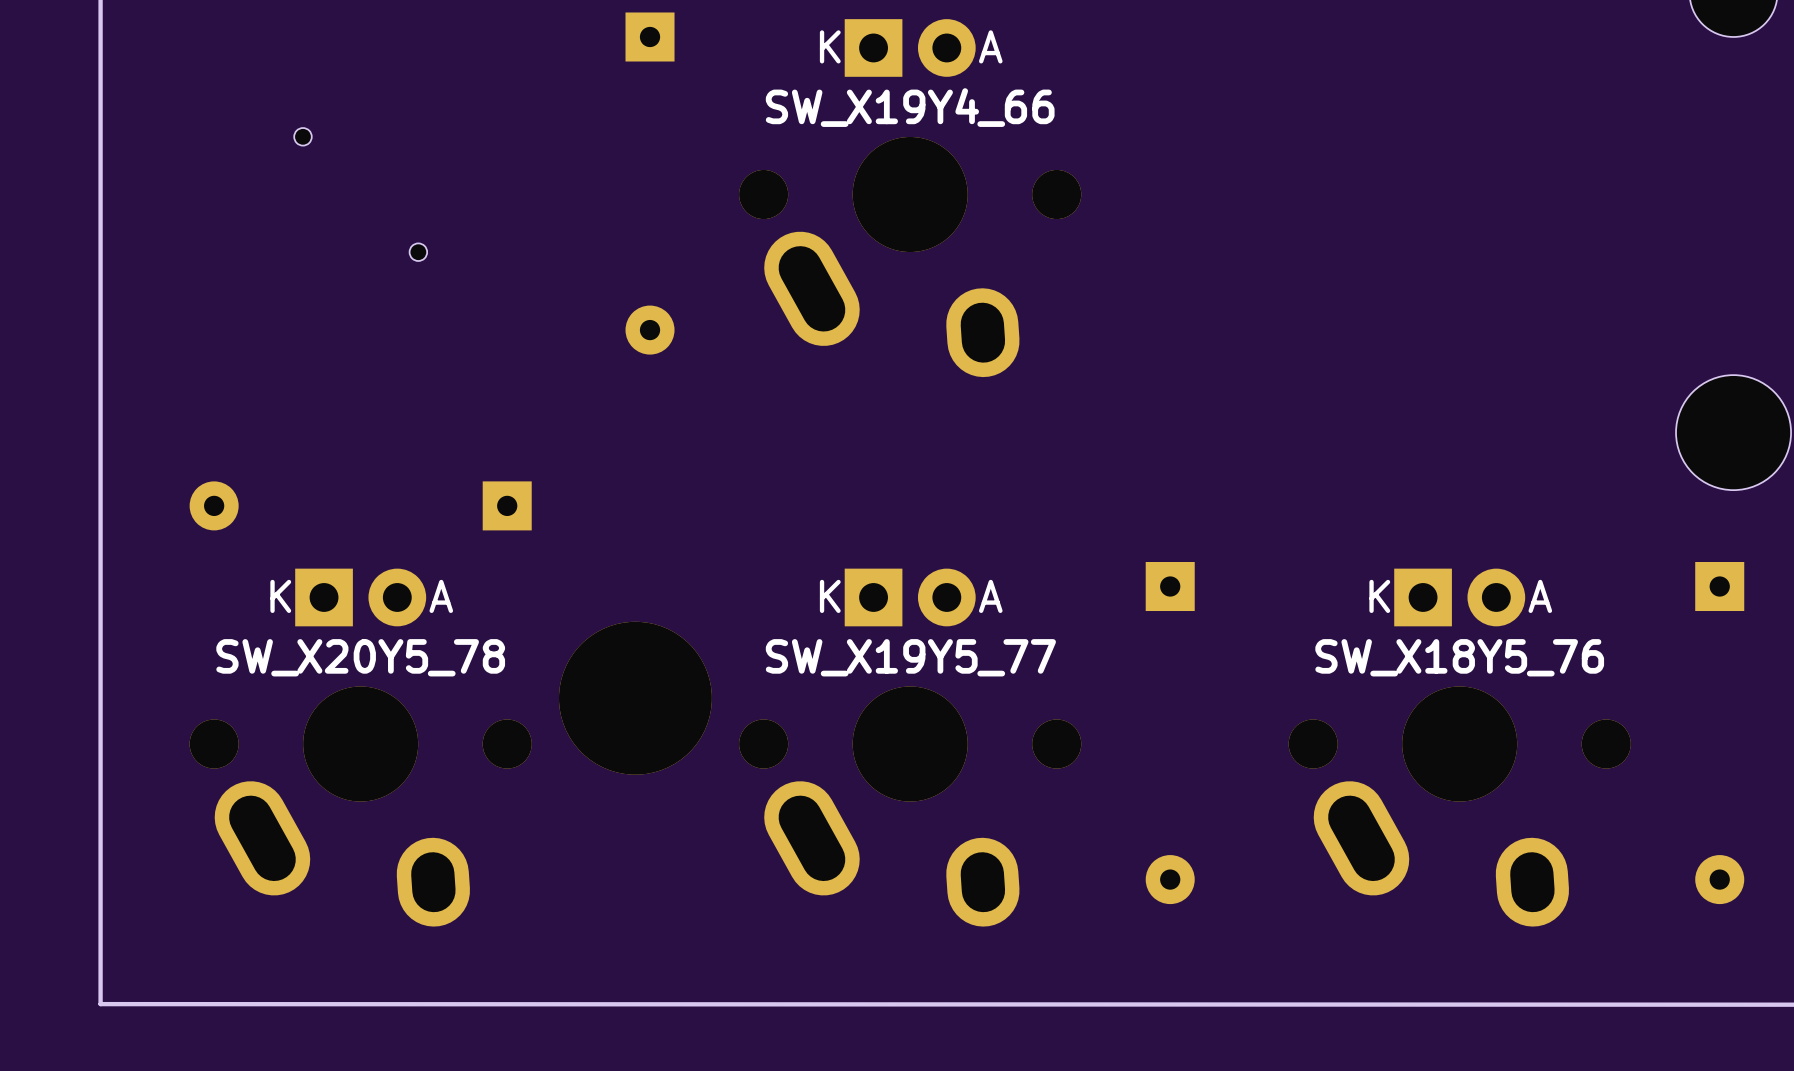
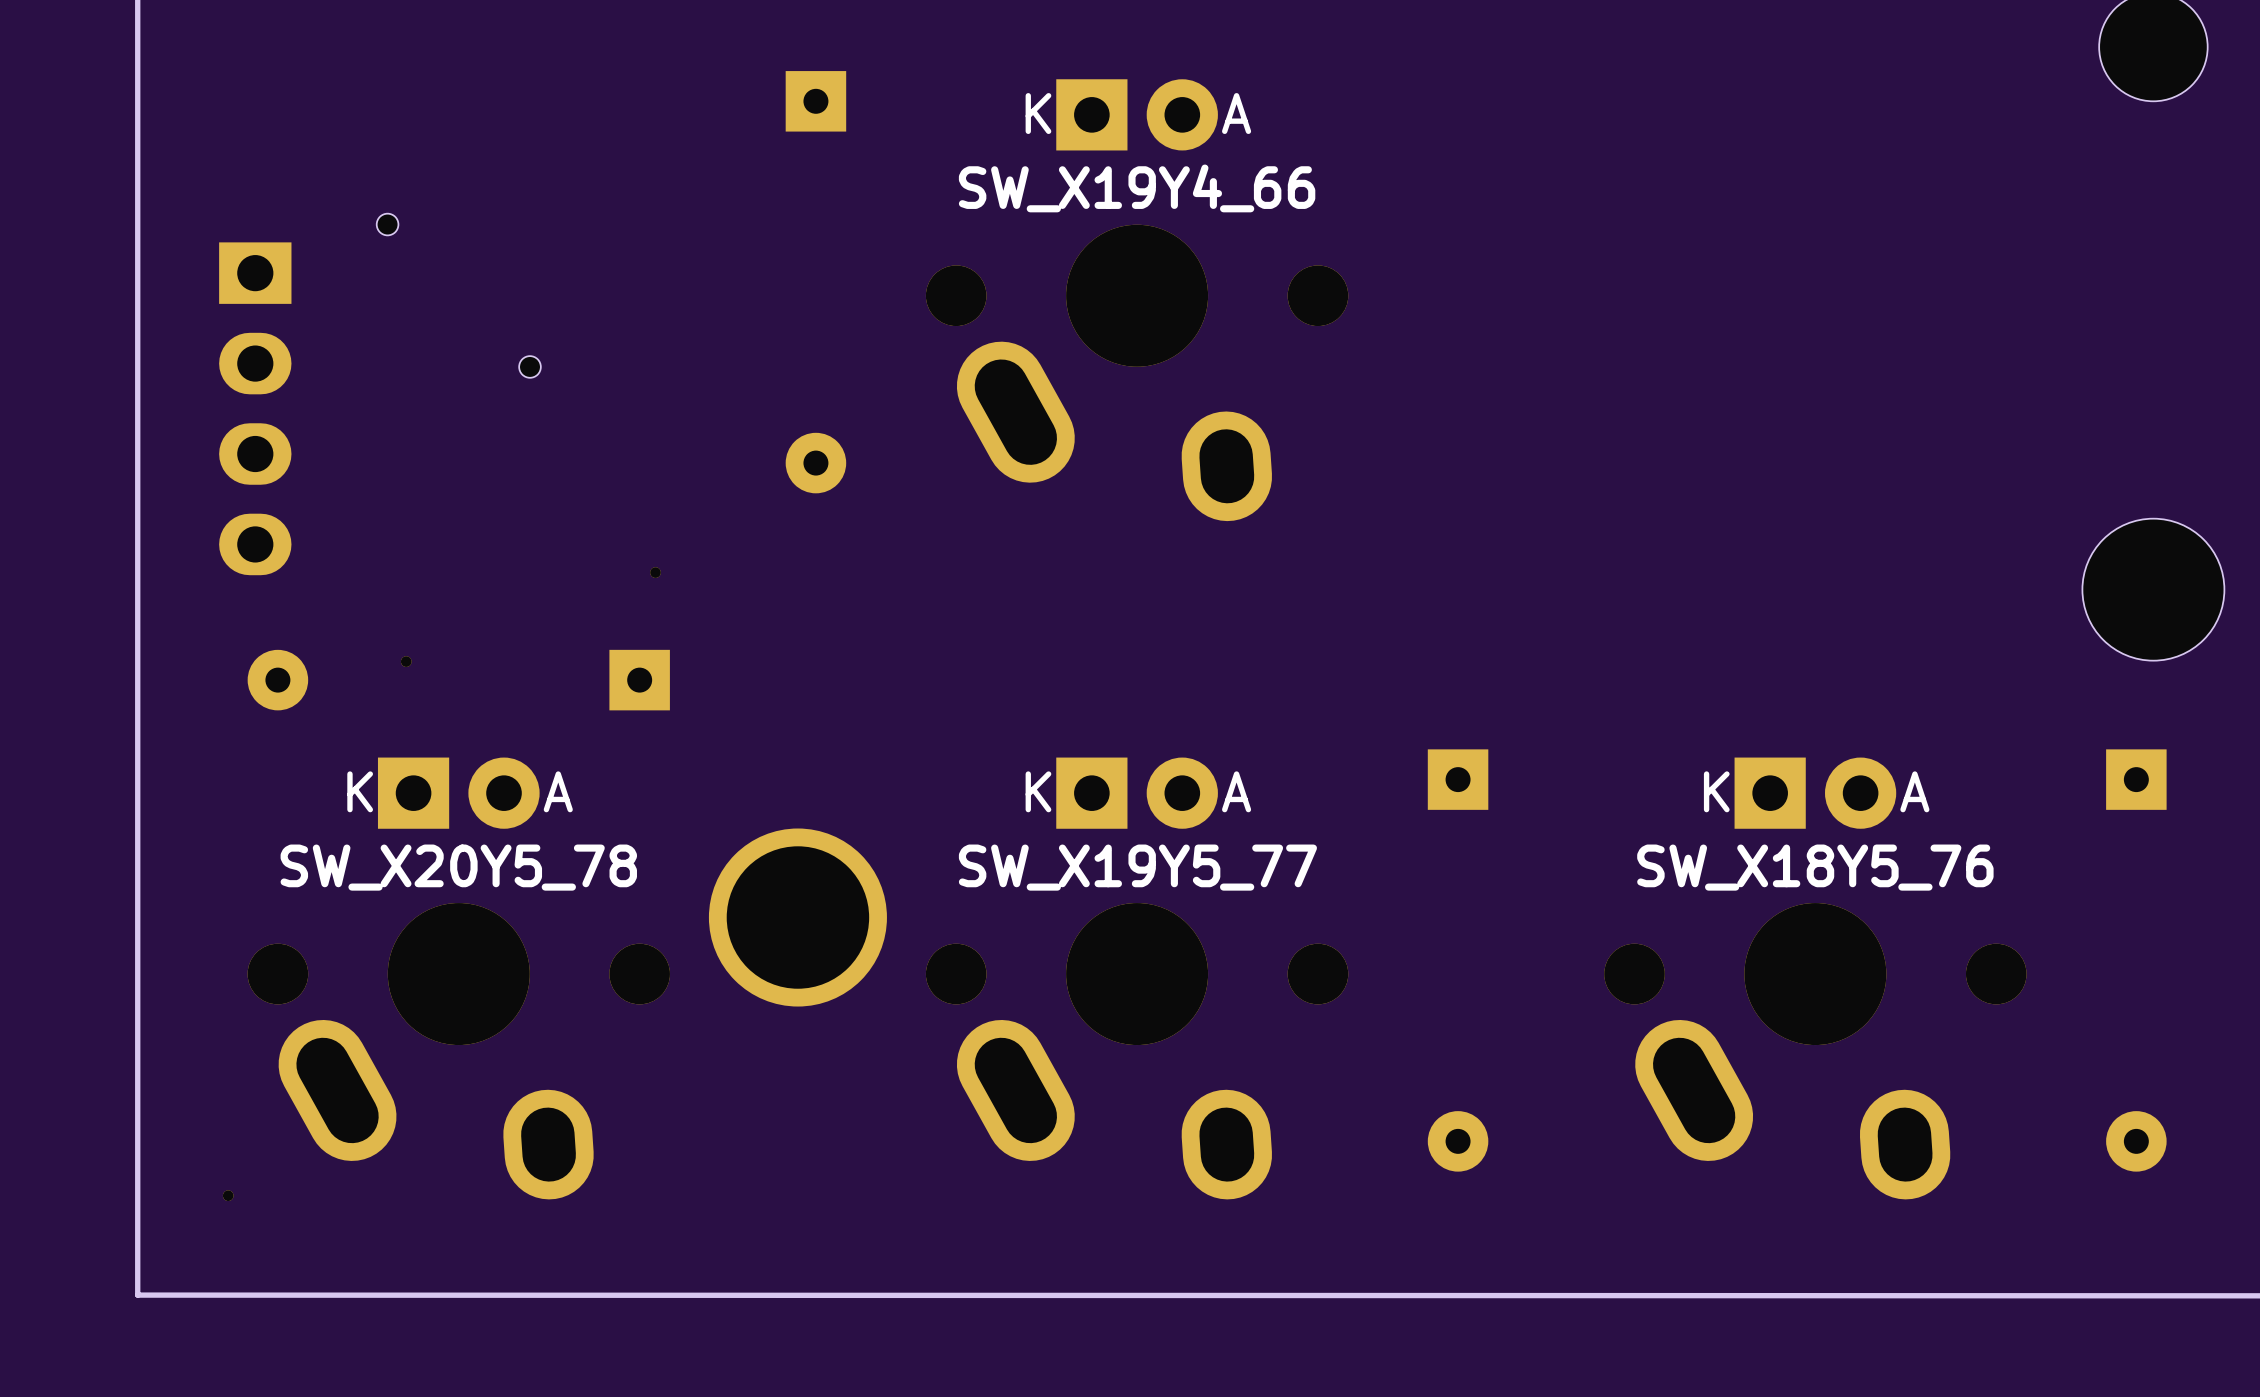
part: none -> (255, 408)
part: none -> (655, 572)
part: none -> (406, 661)
part footprint: [558, 621, 712, 775] -> [708, 828, 887, 1007]
part: none -> (228, 1195)

